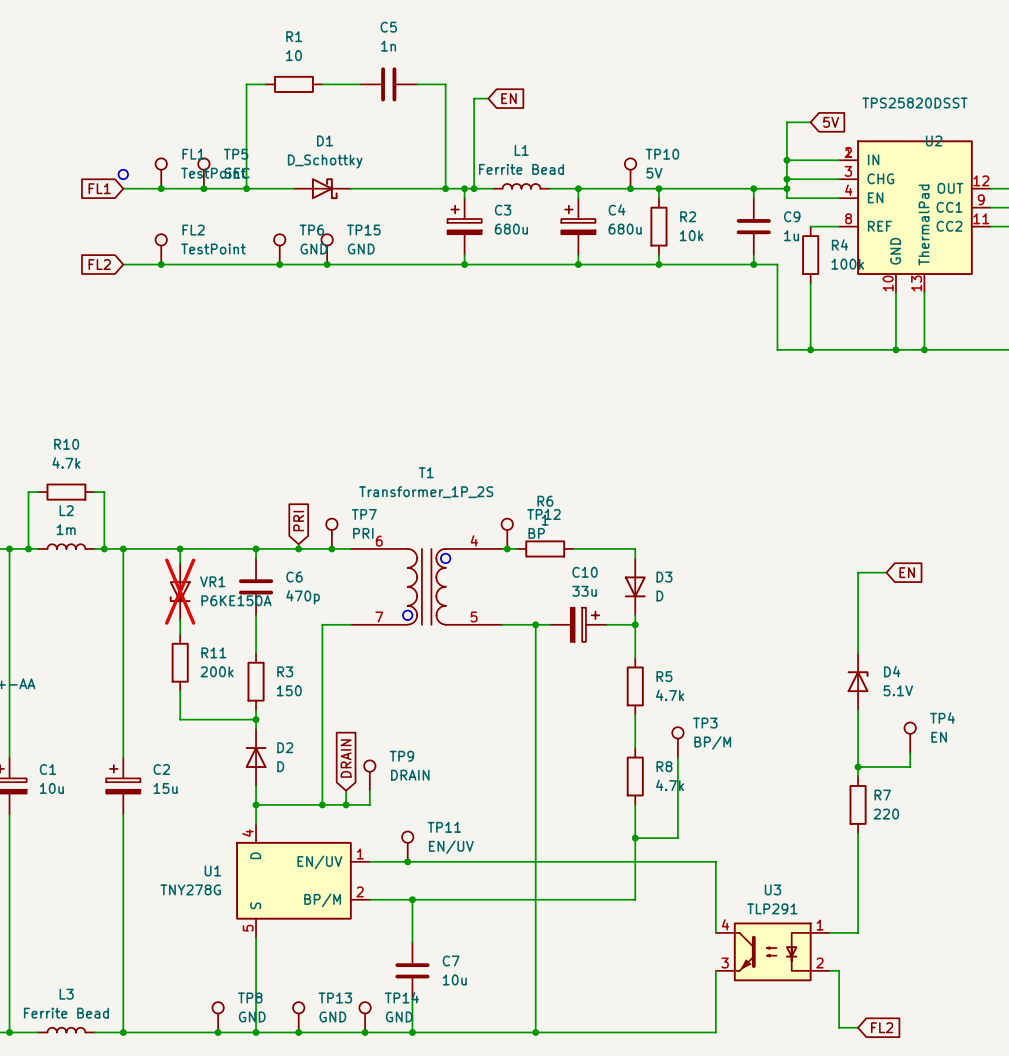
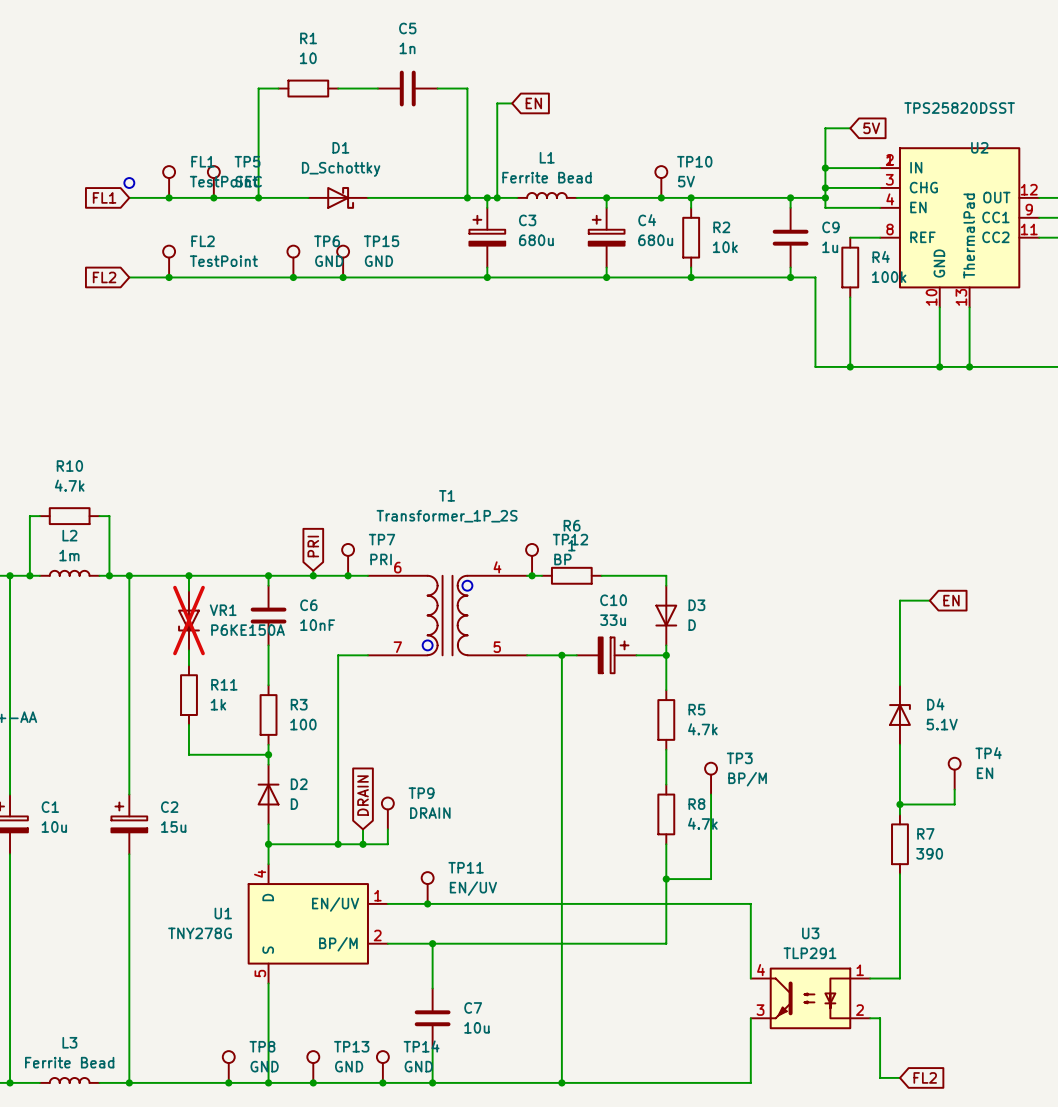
C6 value: 470p (303, 597) -> 10nF (317, 625)
R11 value: 200k (217, 671) -> 1k (218, 704)
R3 value: 150 (289, 690) -> 100 (303, 724)
R7 value: 220 (886, 814) -> 390 (929, 853)

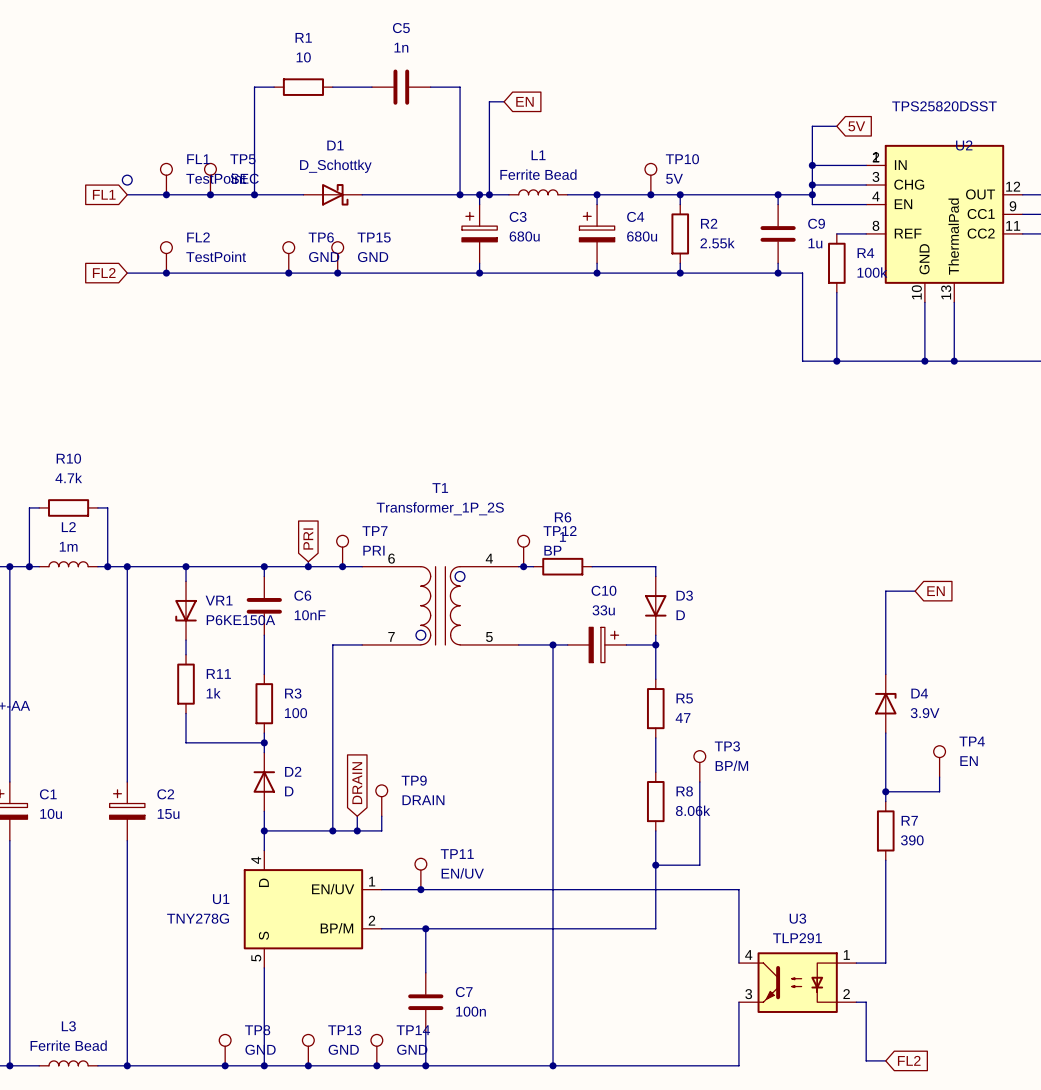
R2 value: 10k (725, 247) -> 2.55k (717, 243)
VR1 do-not-place cross: (188, 620) -> none
D4 value: 5.1V (942, 724) -> 3.9V (925, 713)
R5 value: 4.7k (702, 729) -> 47 (683, 718)
R8 value: 4.7k (702, 823) -> 8.06k (693, 810)
C7 value: 10u (476, 1027) -> 100n (471, 1011)

